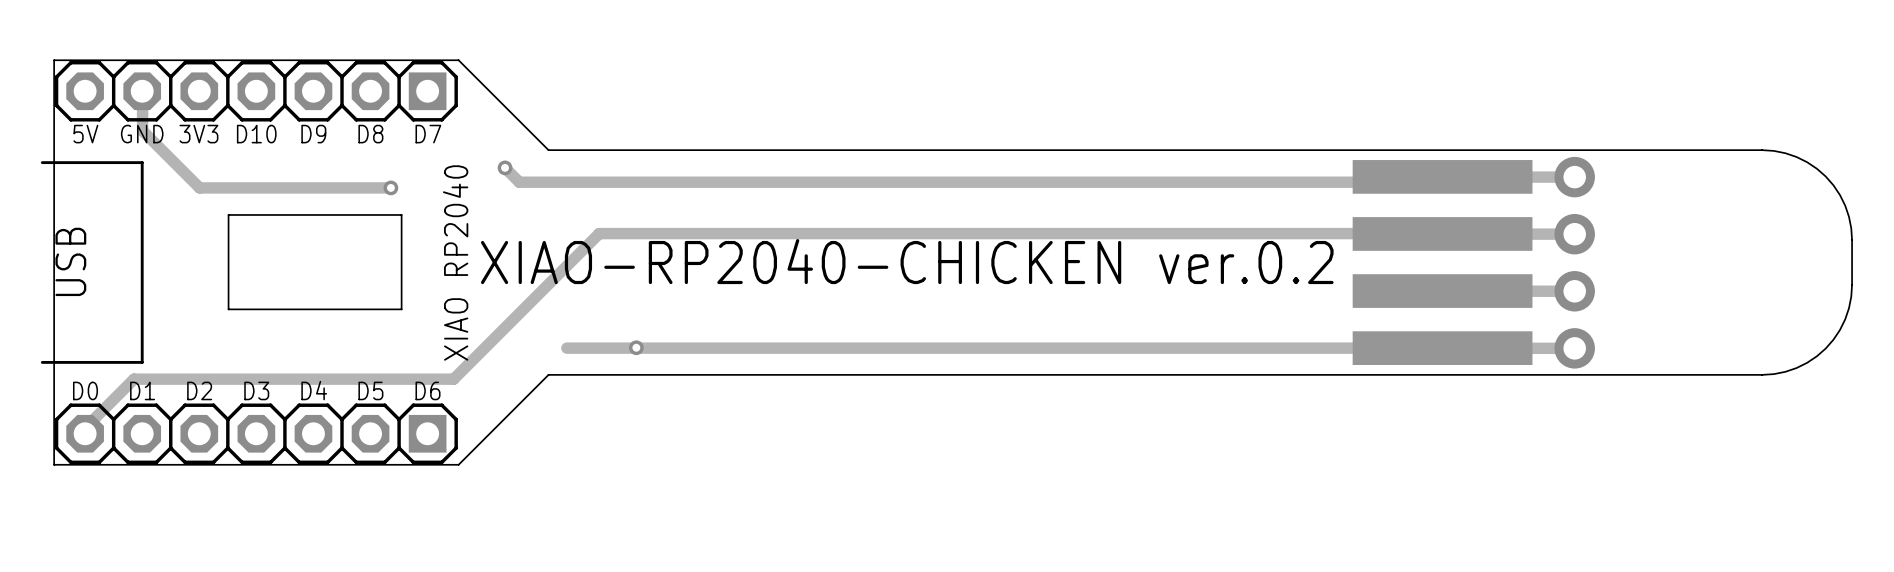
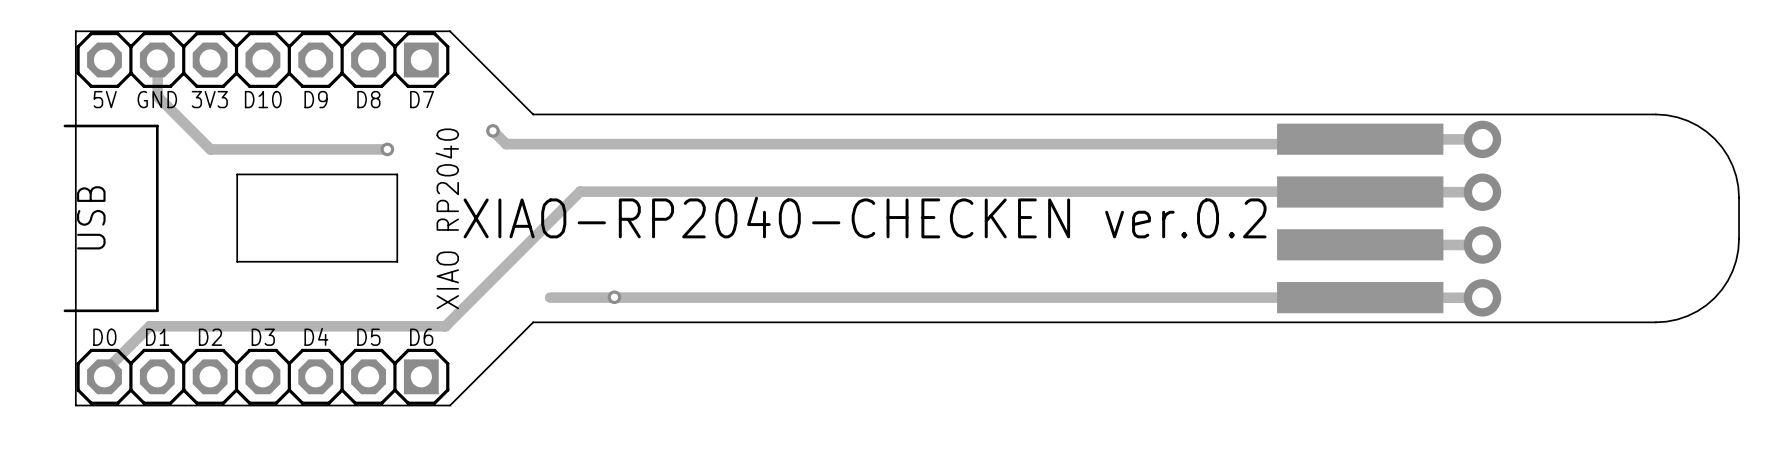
text: XIAO-RP2040-CHICKEN ver.0.2 (907, 261) -> XIAO-RP2040-CHECKEN ver.0.2 (865, 217)

